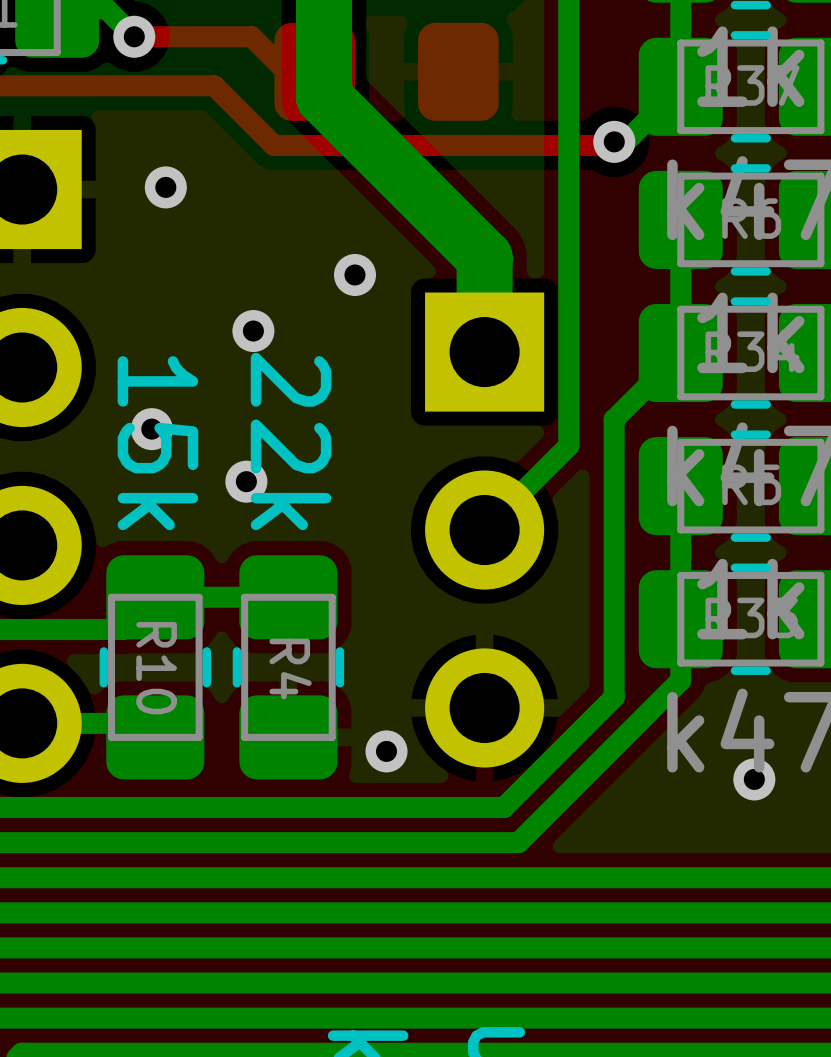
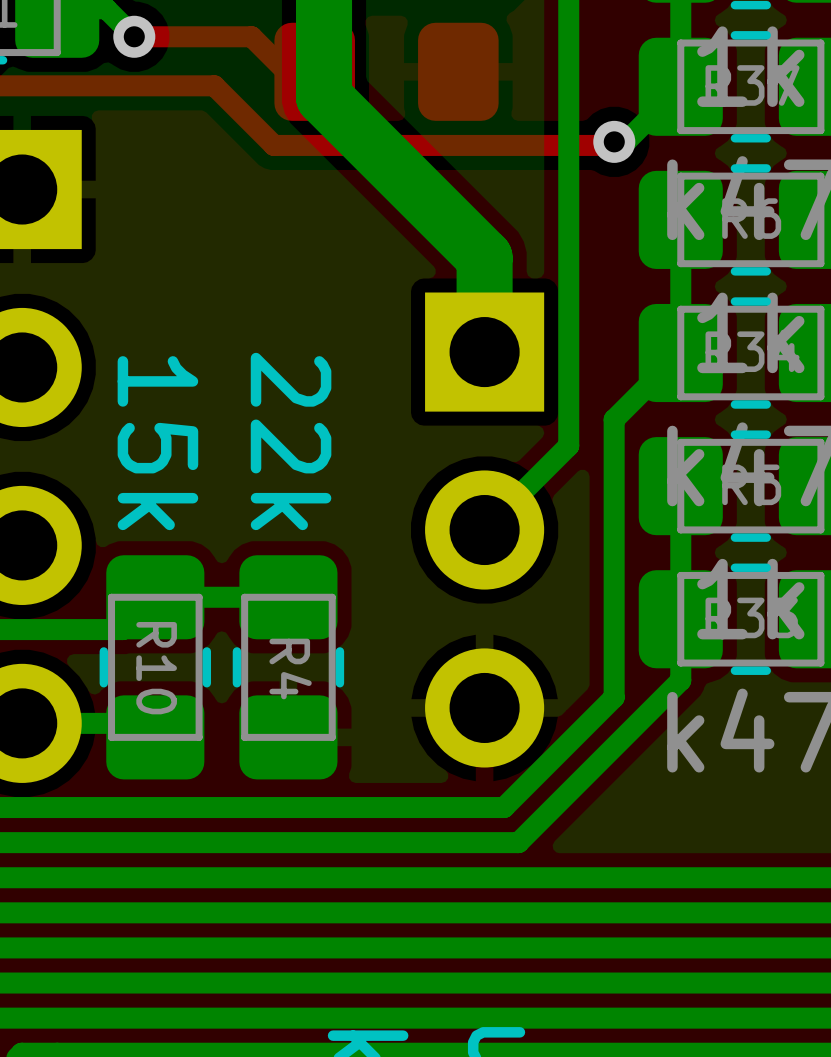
via: (165, 187) -> none
via: (354, 274) -> none
via: (253, 331) -> none
via: (151, 429) -> none
via: (246, 481) -> none
via: (386, 751) -> none
via: (754, 779) -> none

